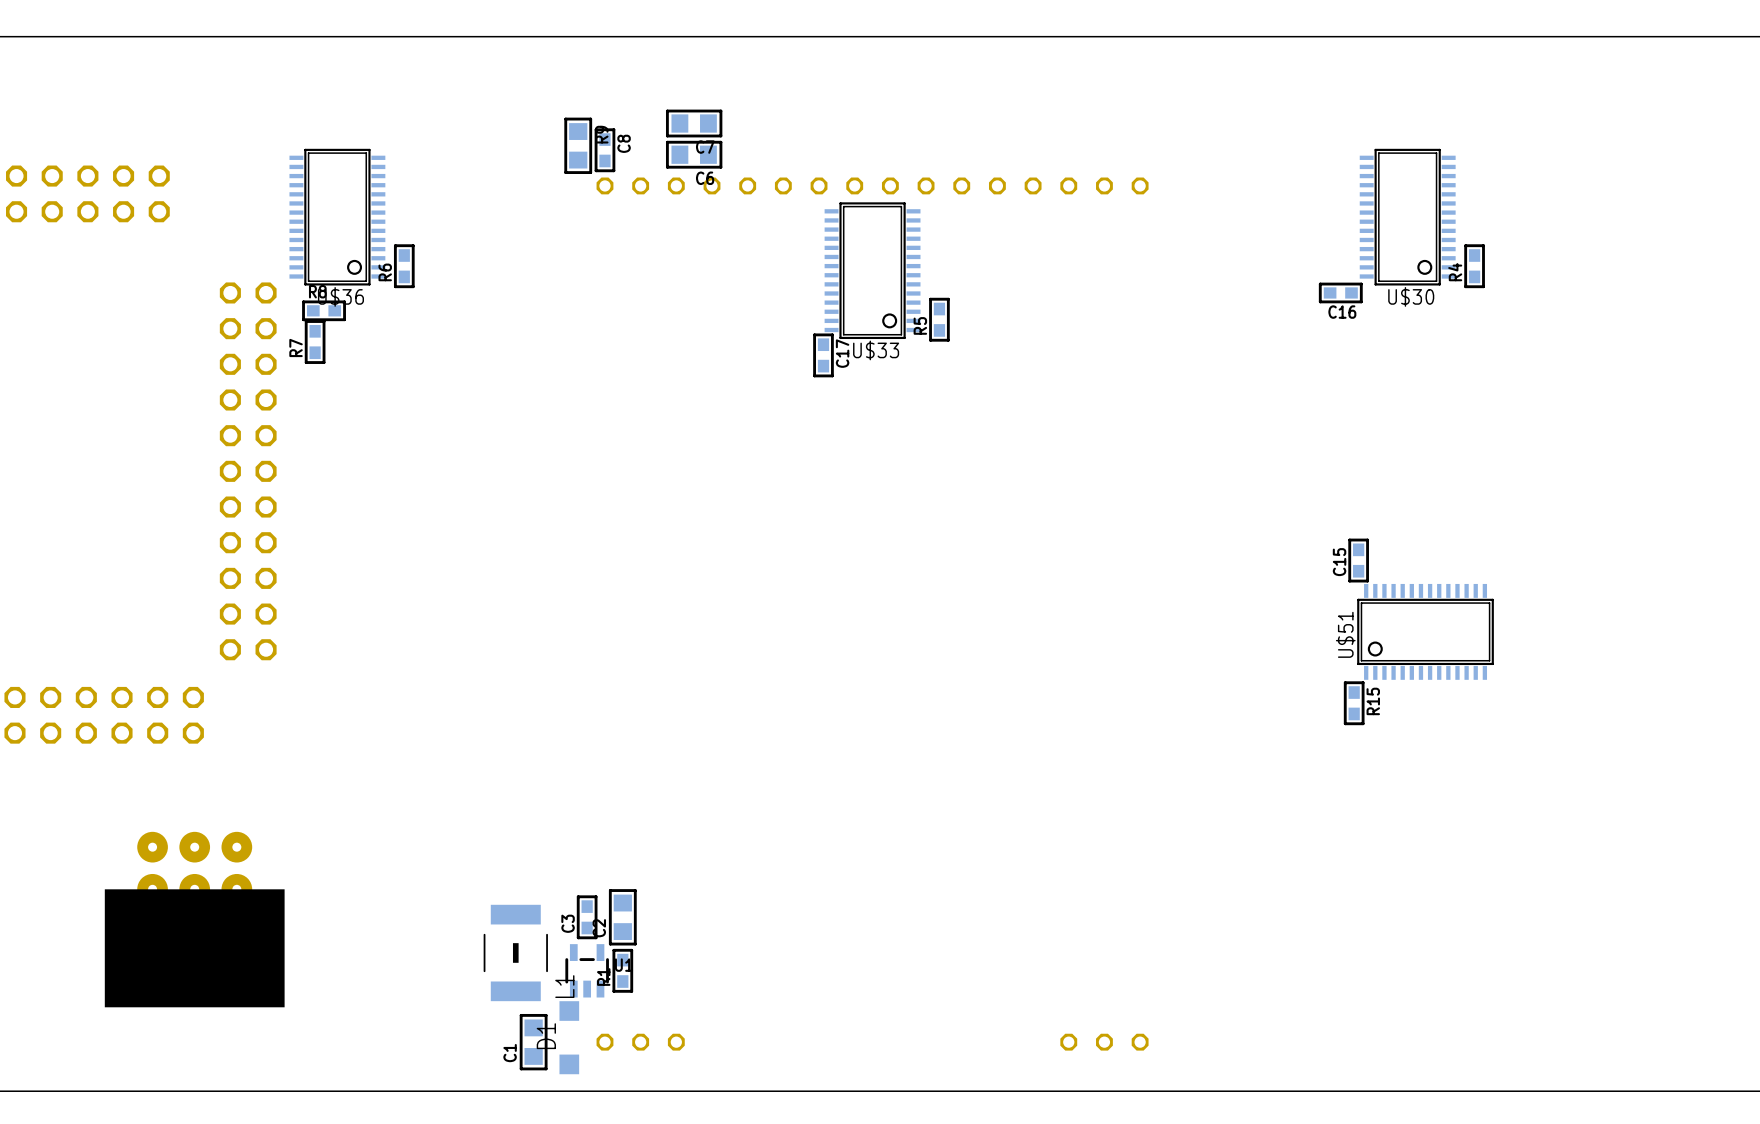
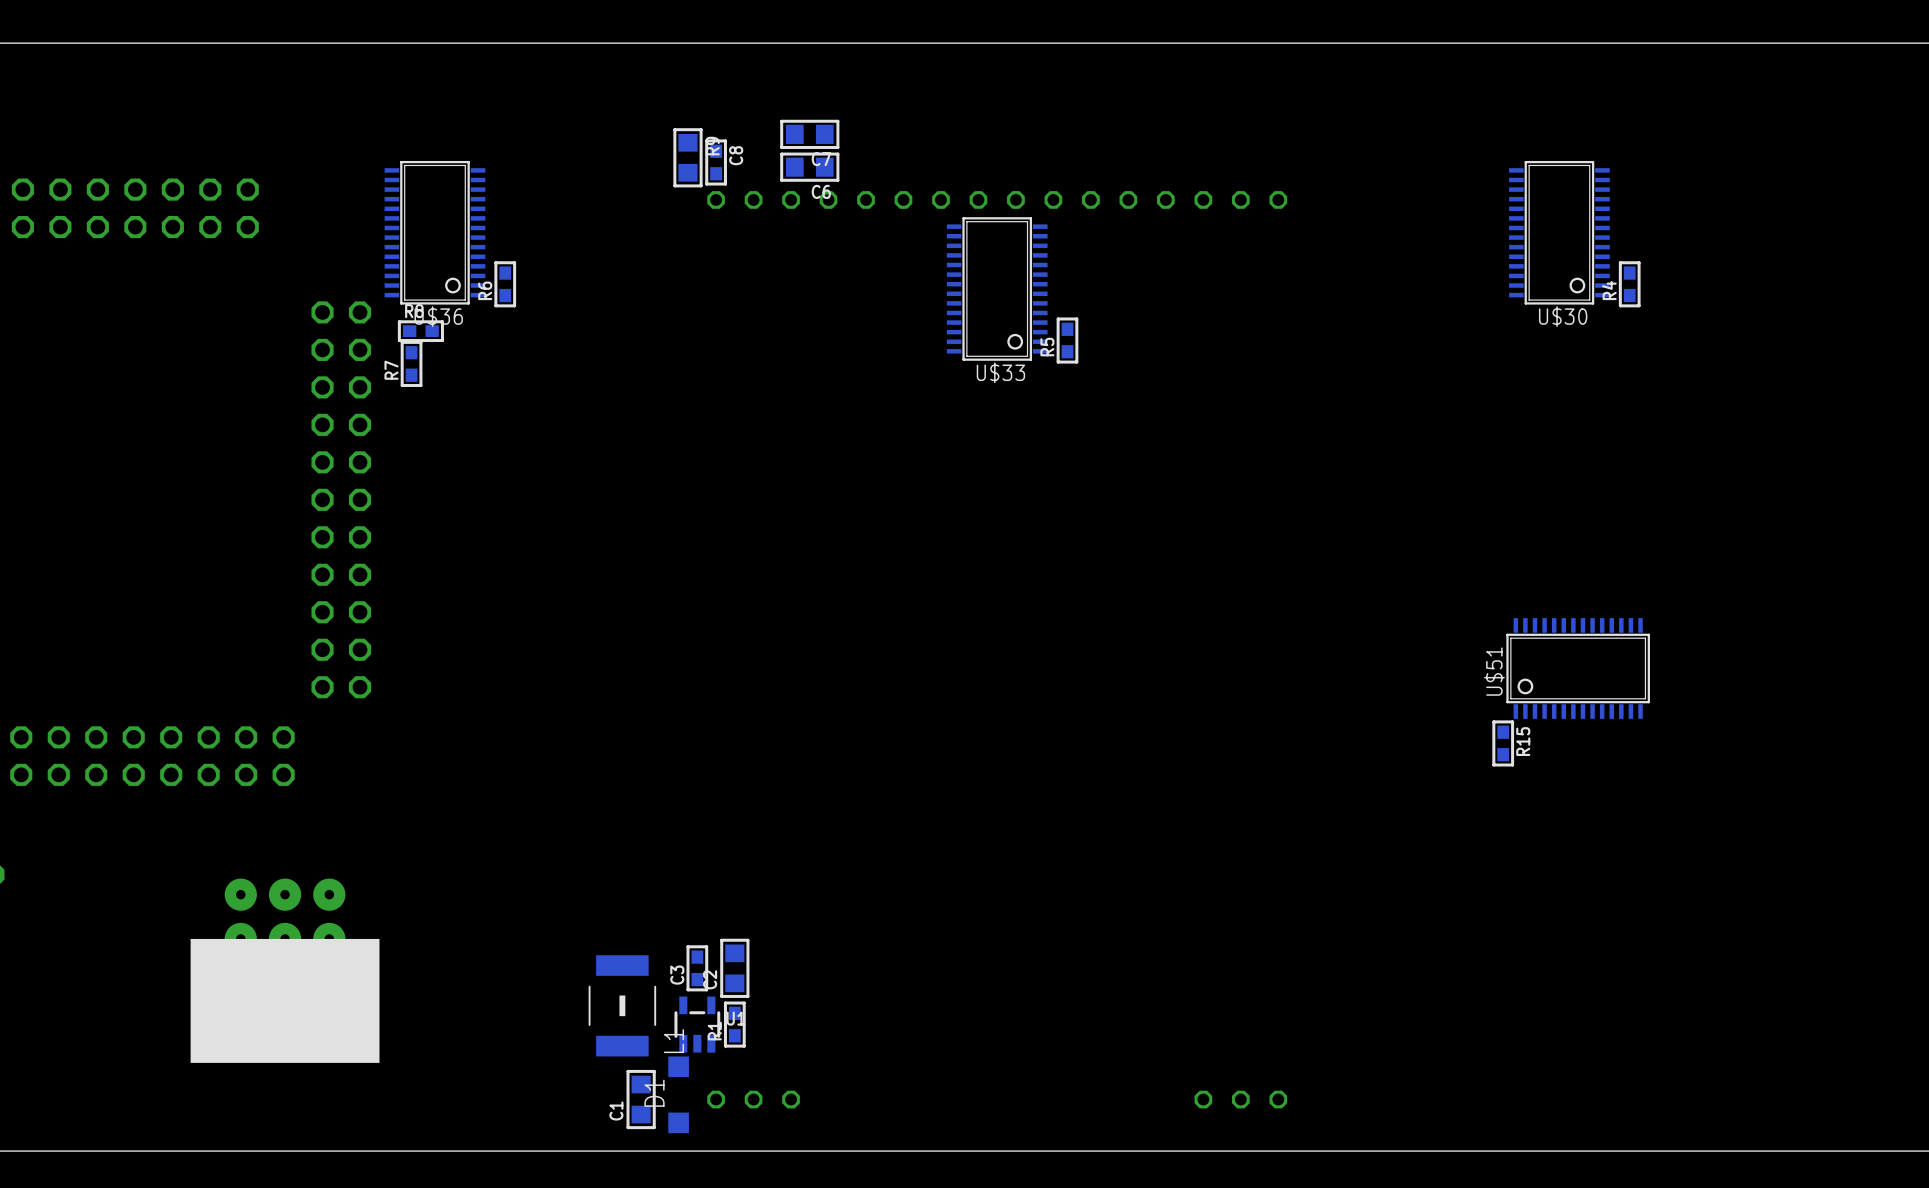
C16: (1340, 292) -> none
C17: (823, 355) -> none
C15: (1358, 560) -> none

